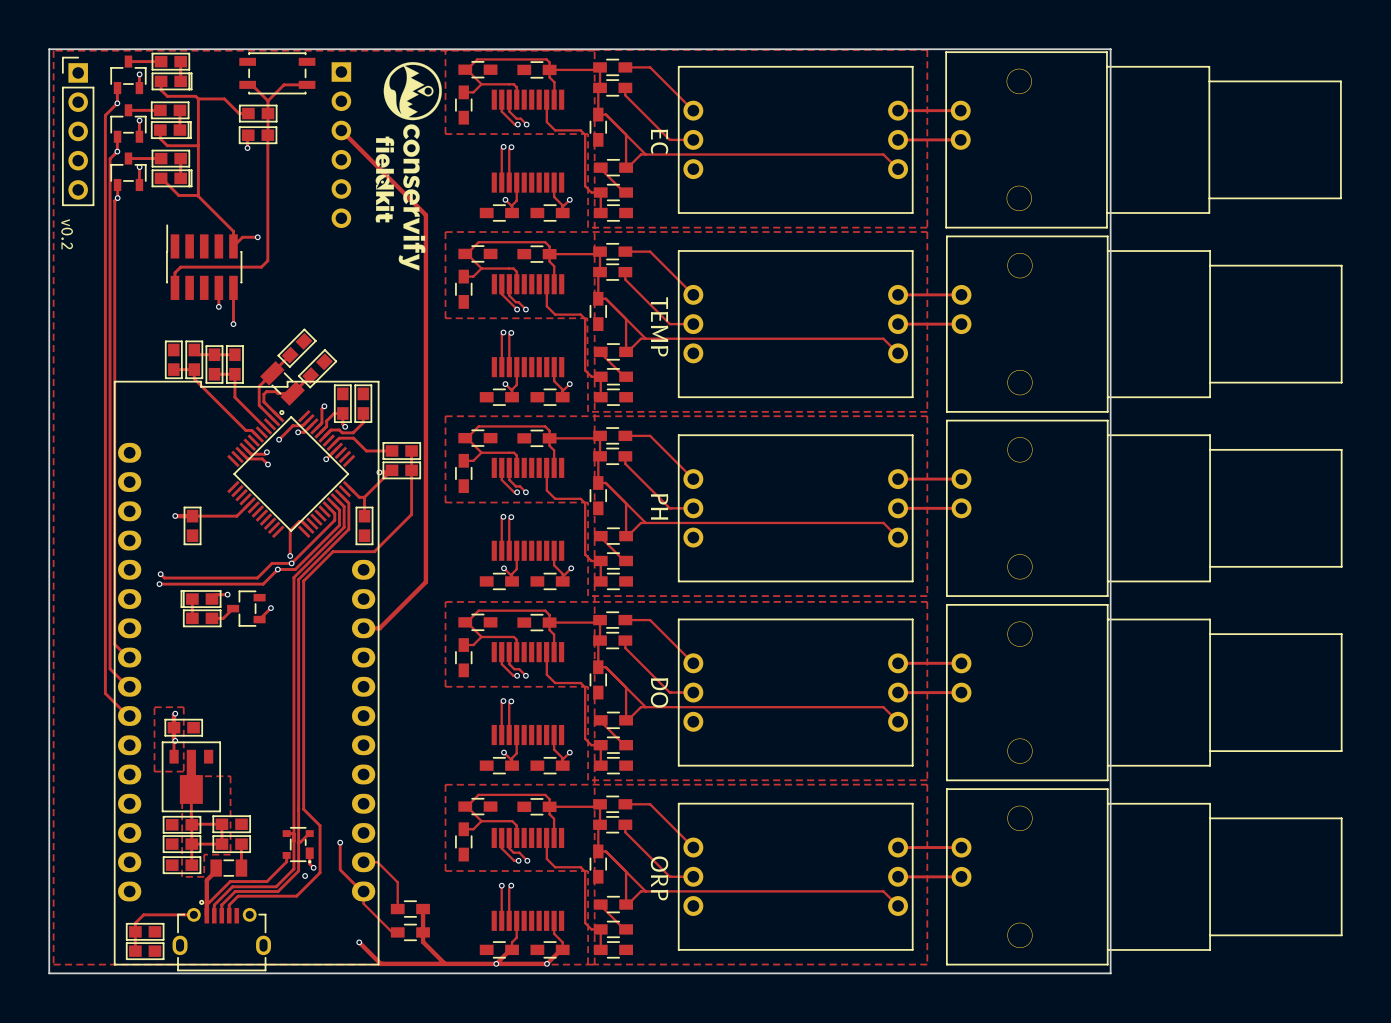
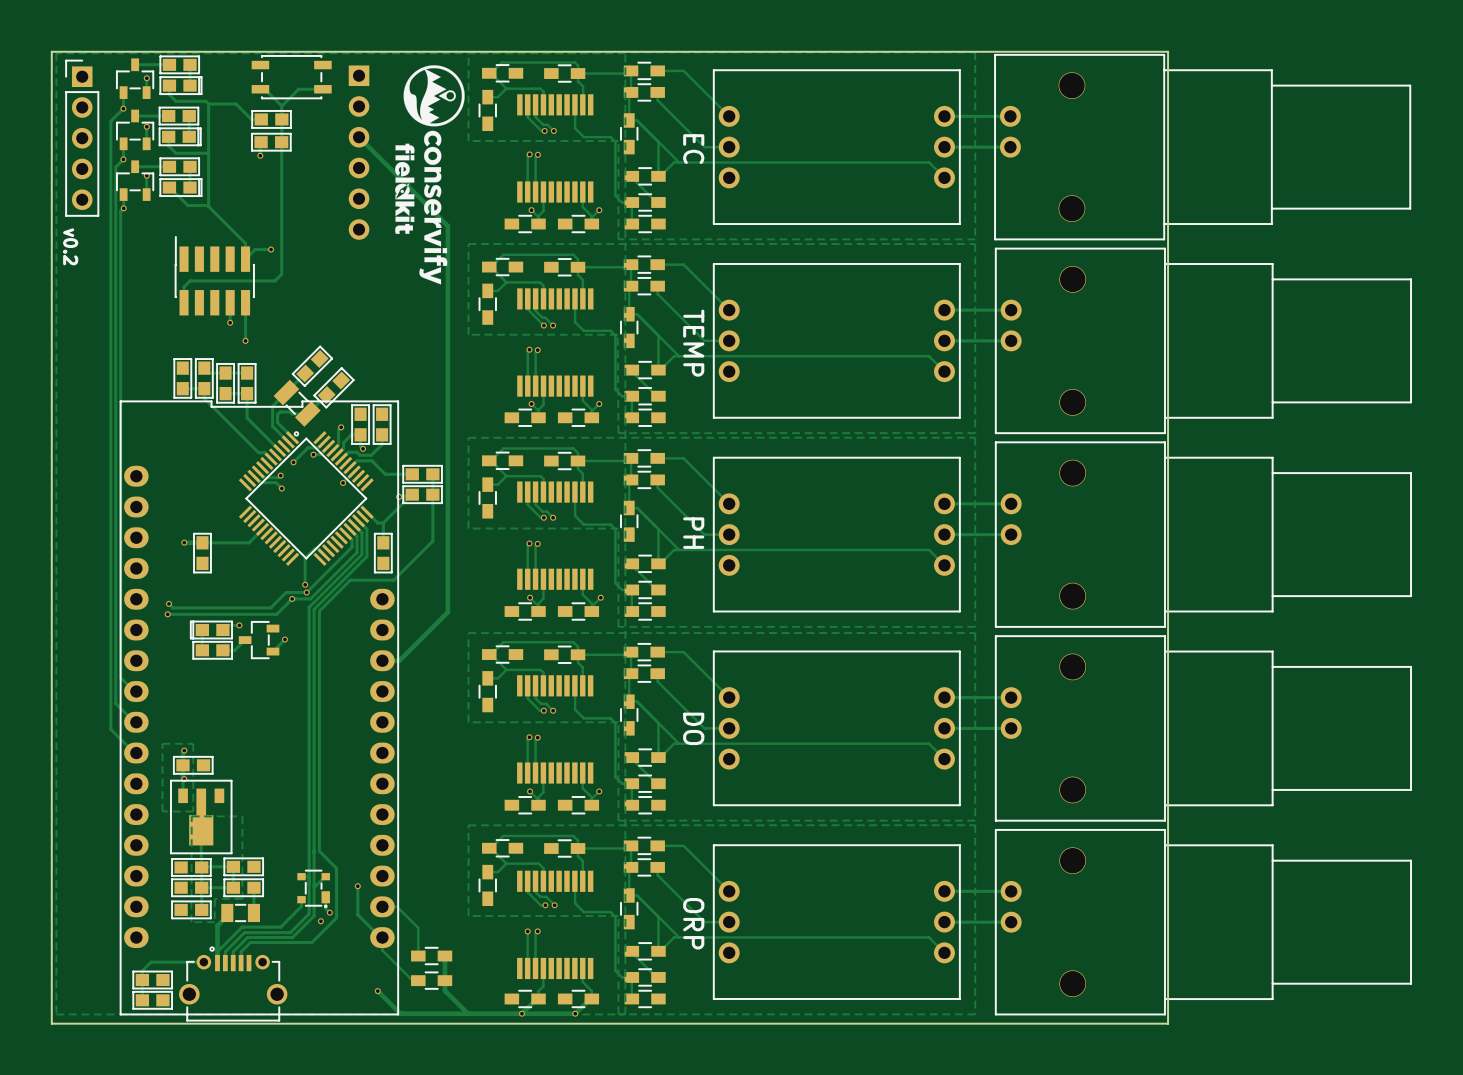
part footprint: [172, 899, 272, 972] -> [179, 946, 288, 1022]

